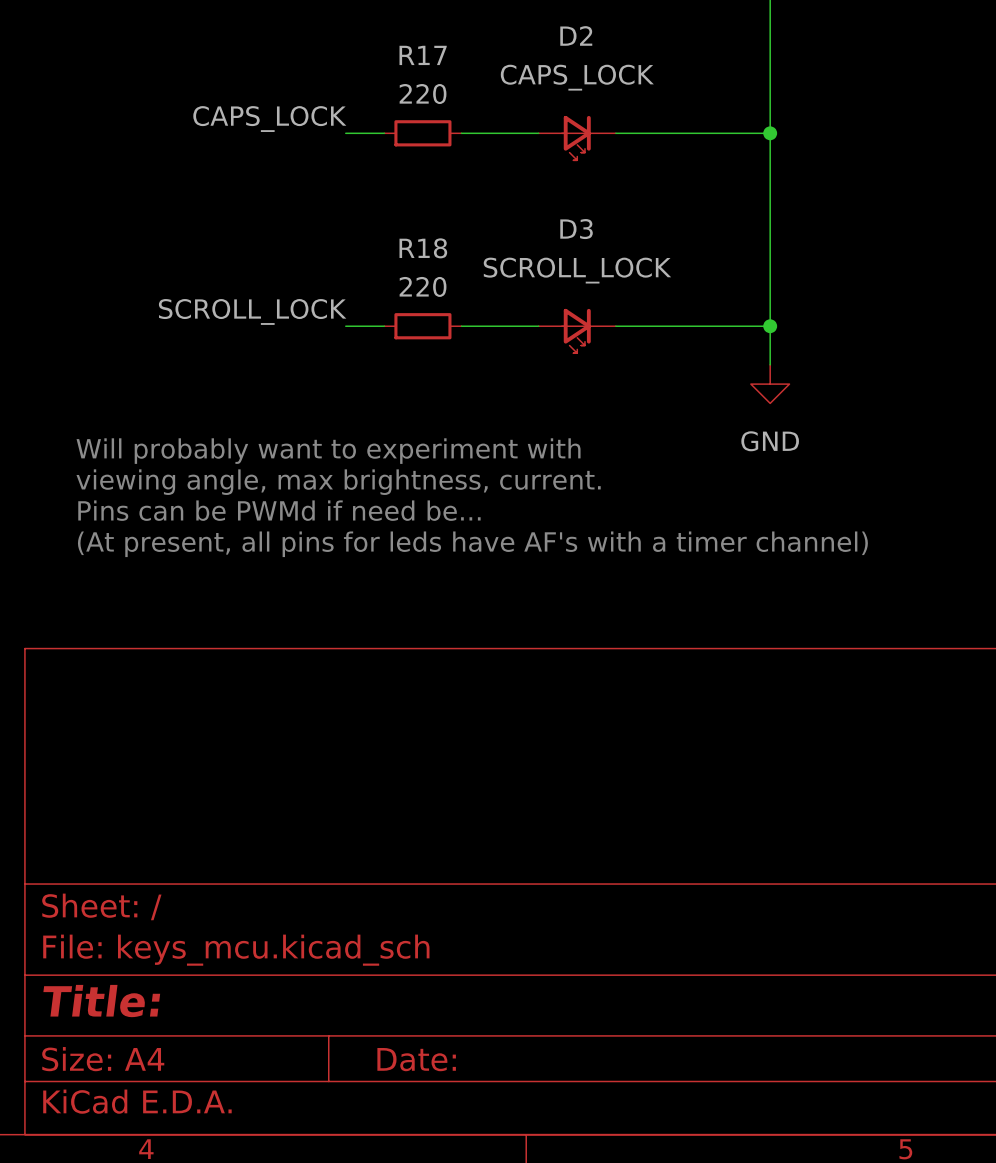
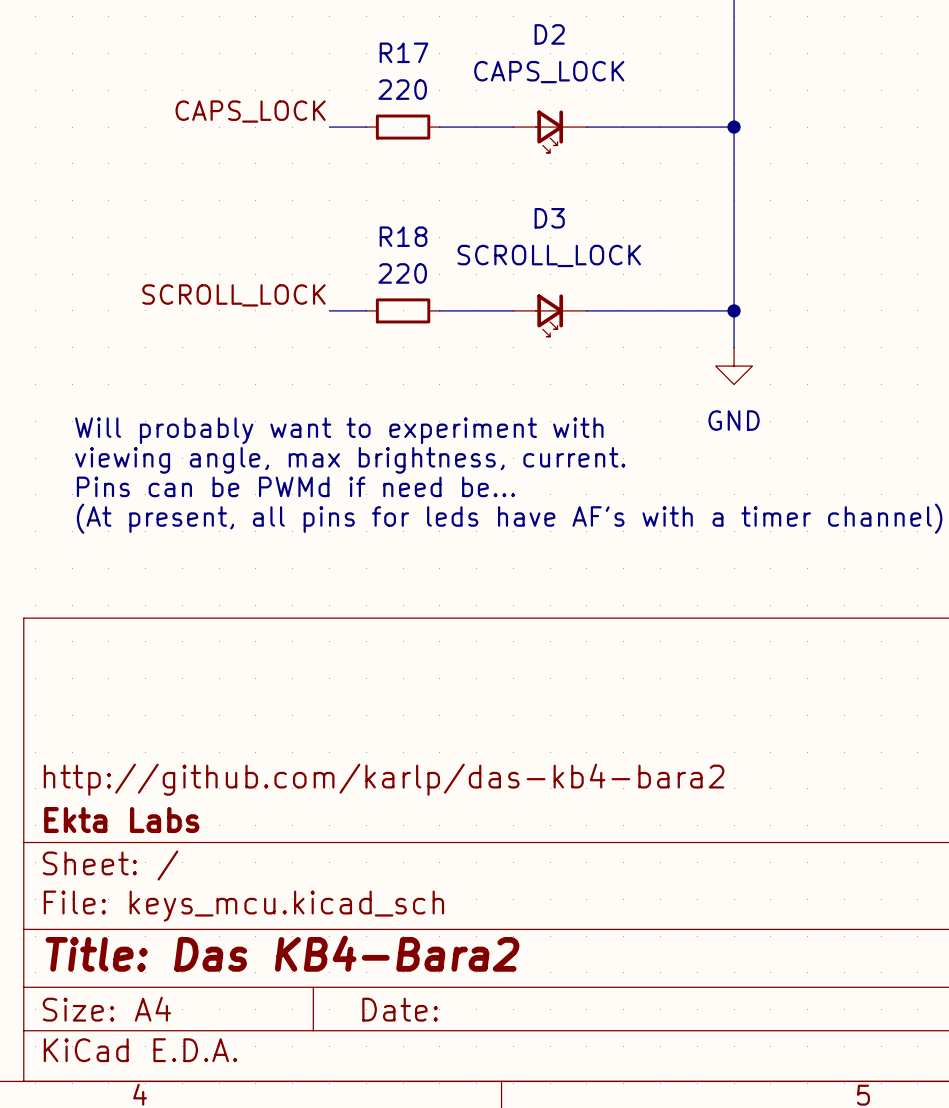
title block: none -> http://github.com/karlp/das-kb4-bara2 (384, 779)
title block: none -> Ekta Labs (121, 820)
title block: Title: (101, 1001) -> Title: Das KB4-Bara2 (282, 953)

